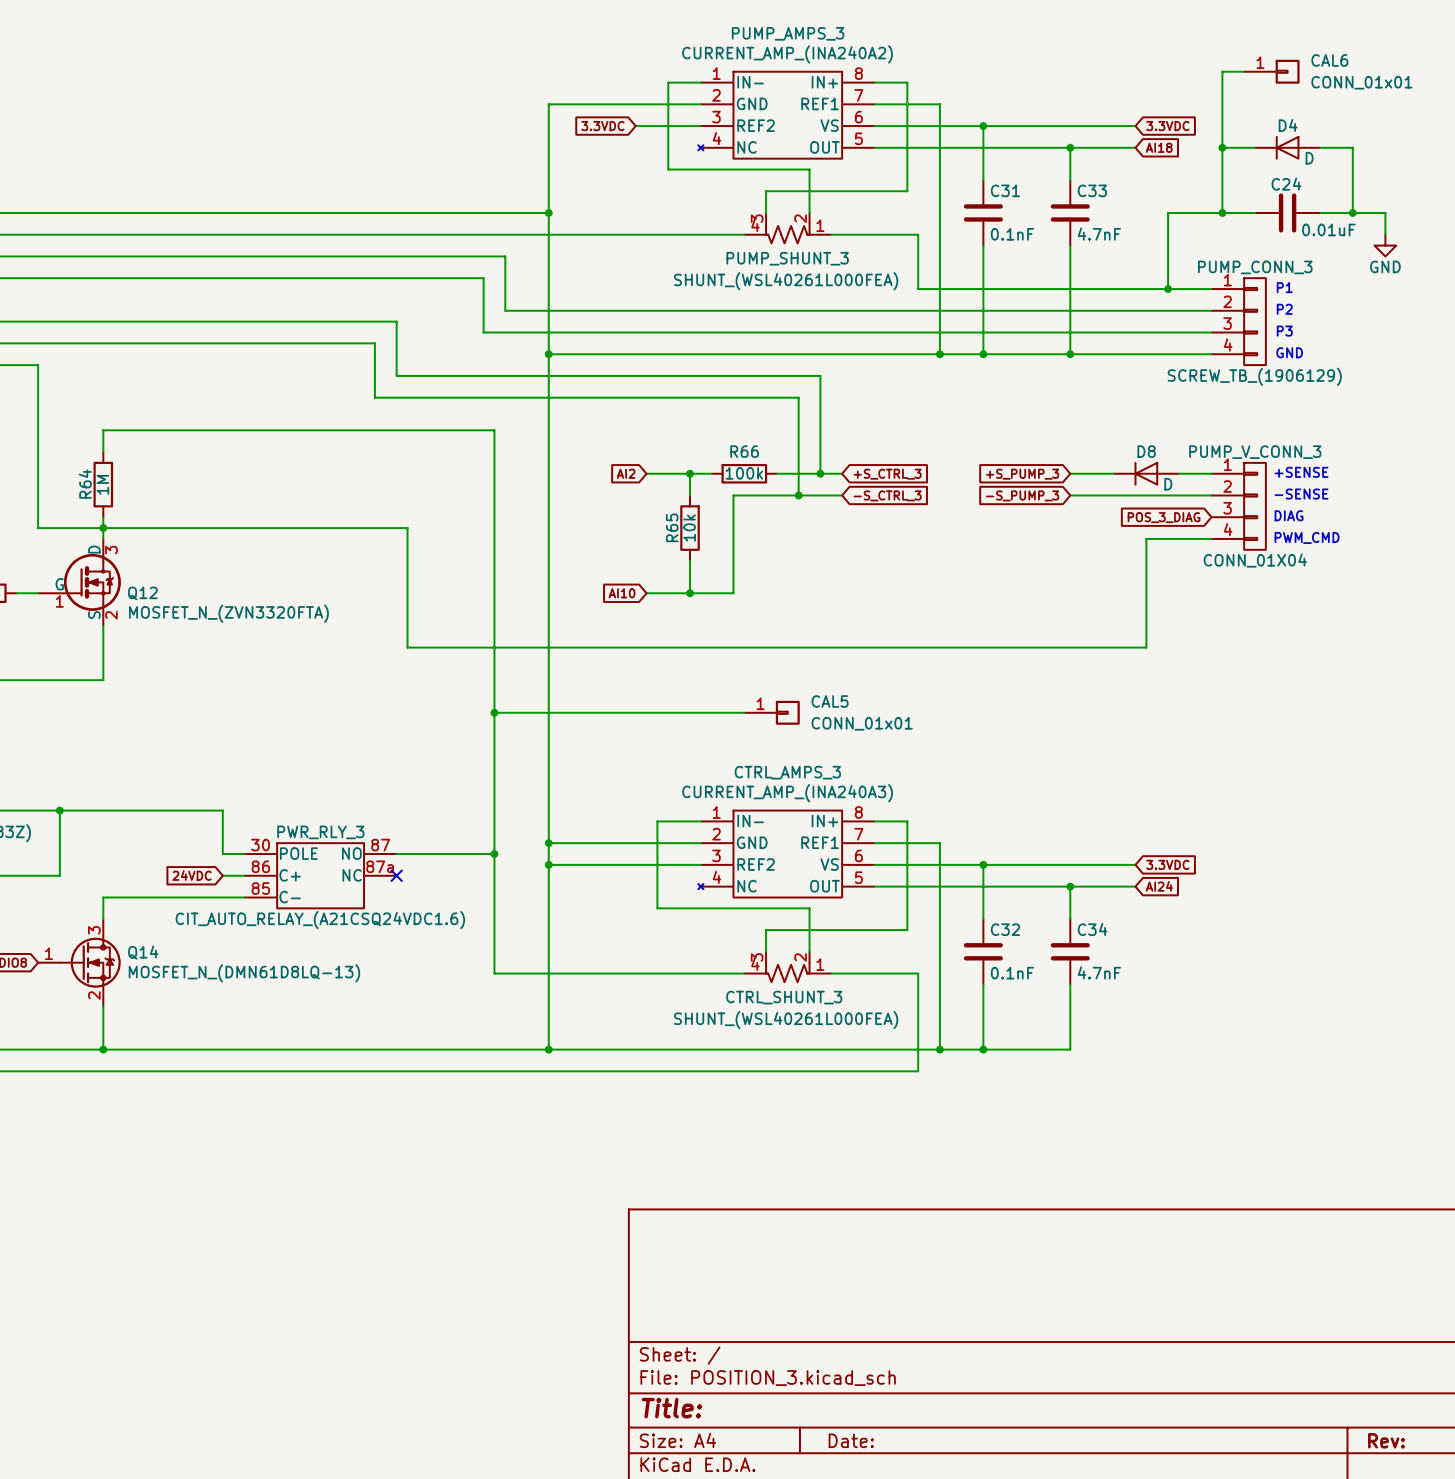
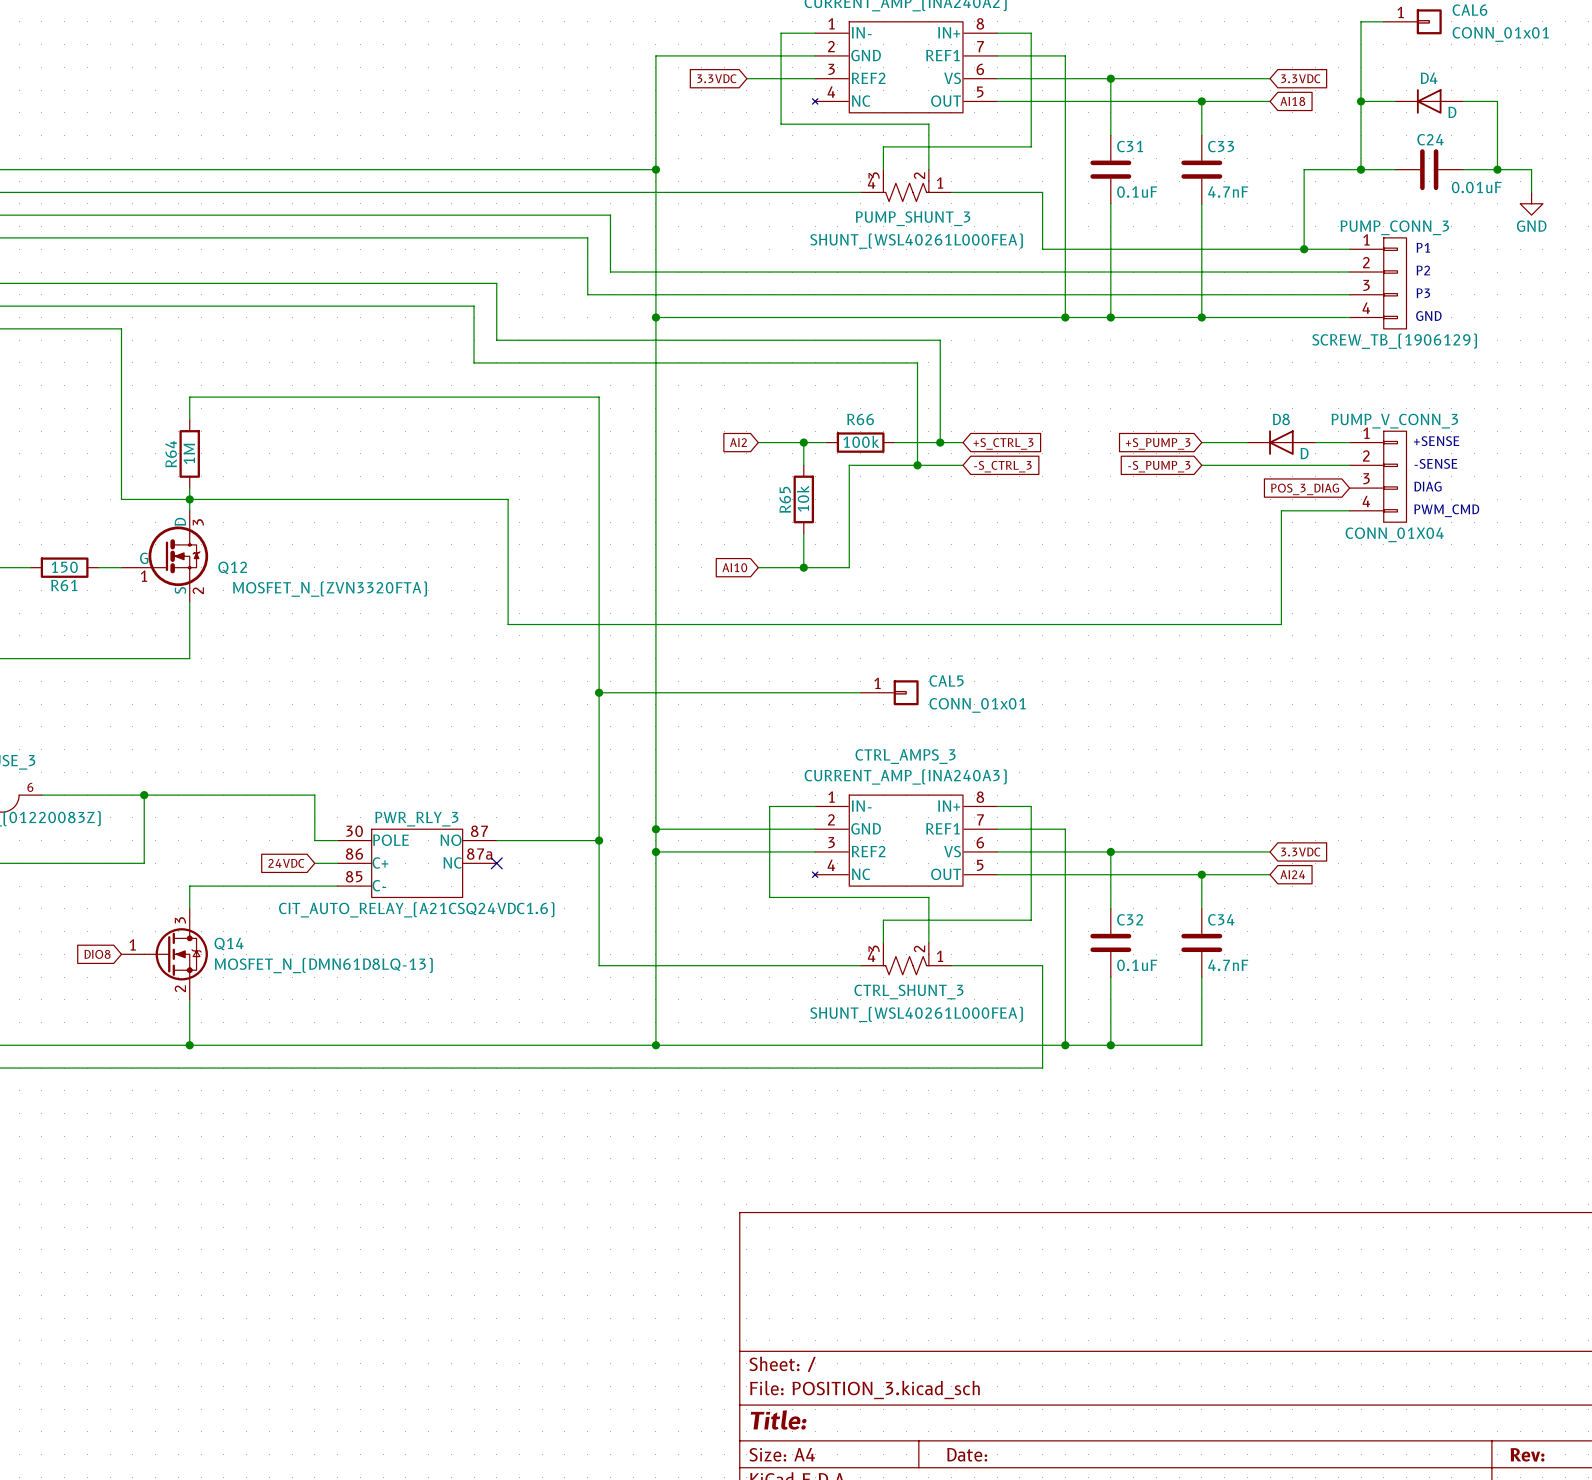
C31 value: 0.1nF (1012, 234) -> 0.1uF (1137, 192)
C32 value: 0.1nF (1012, 973) -> 0.1uF (1137, 965)

